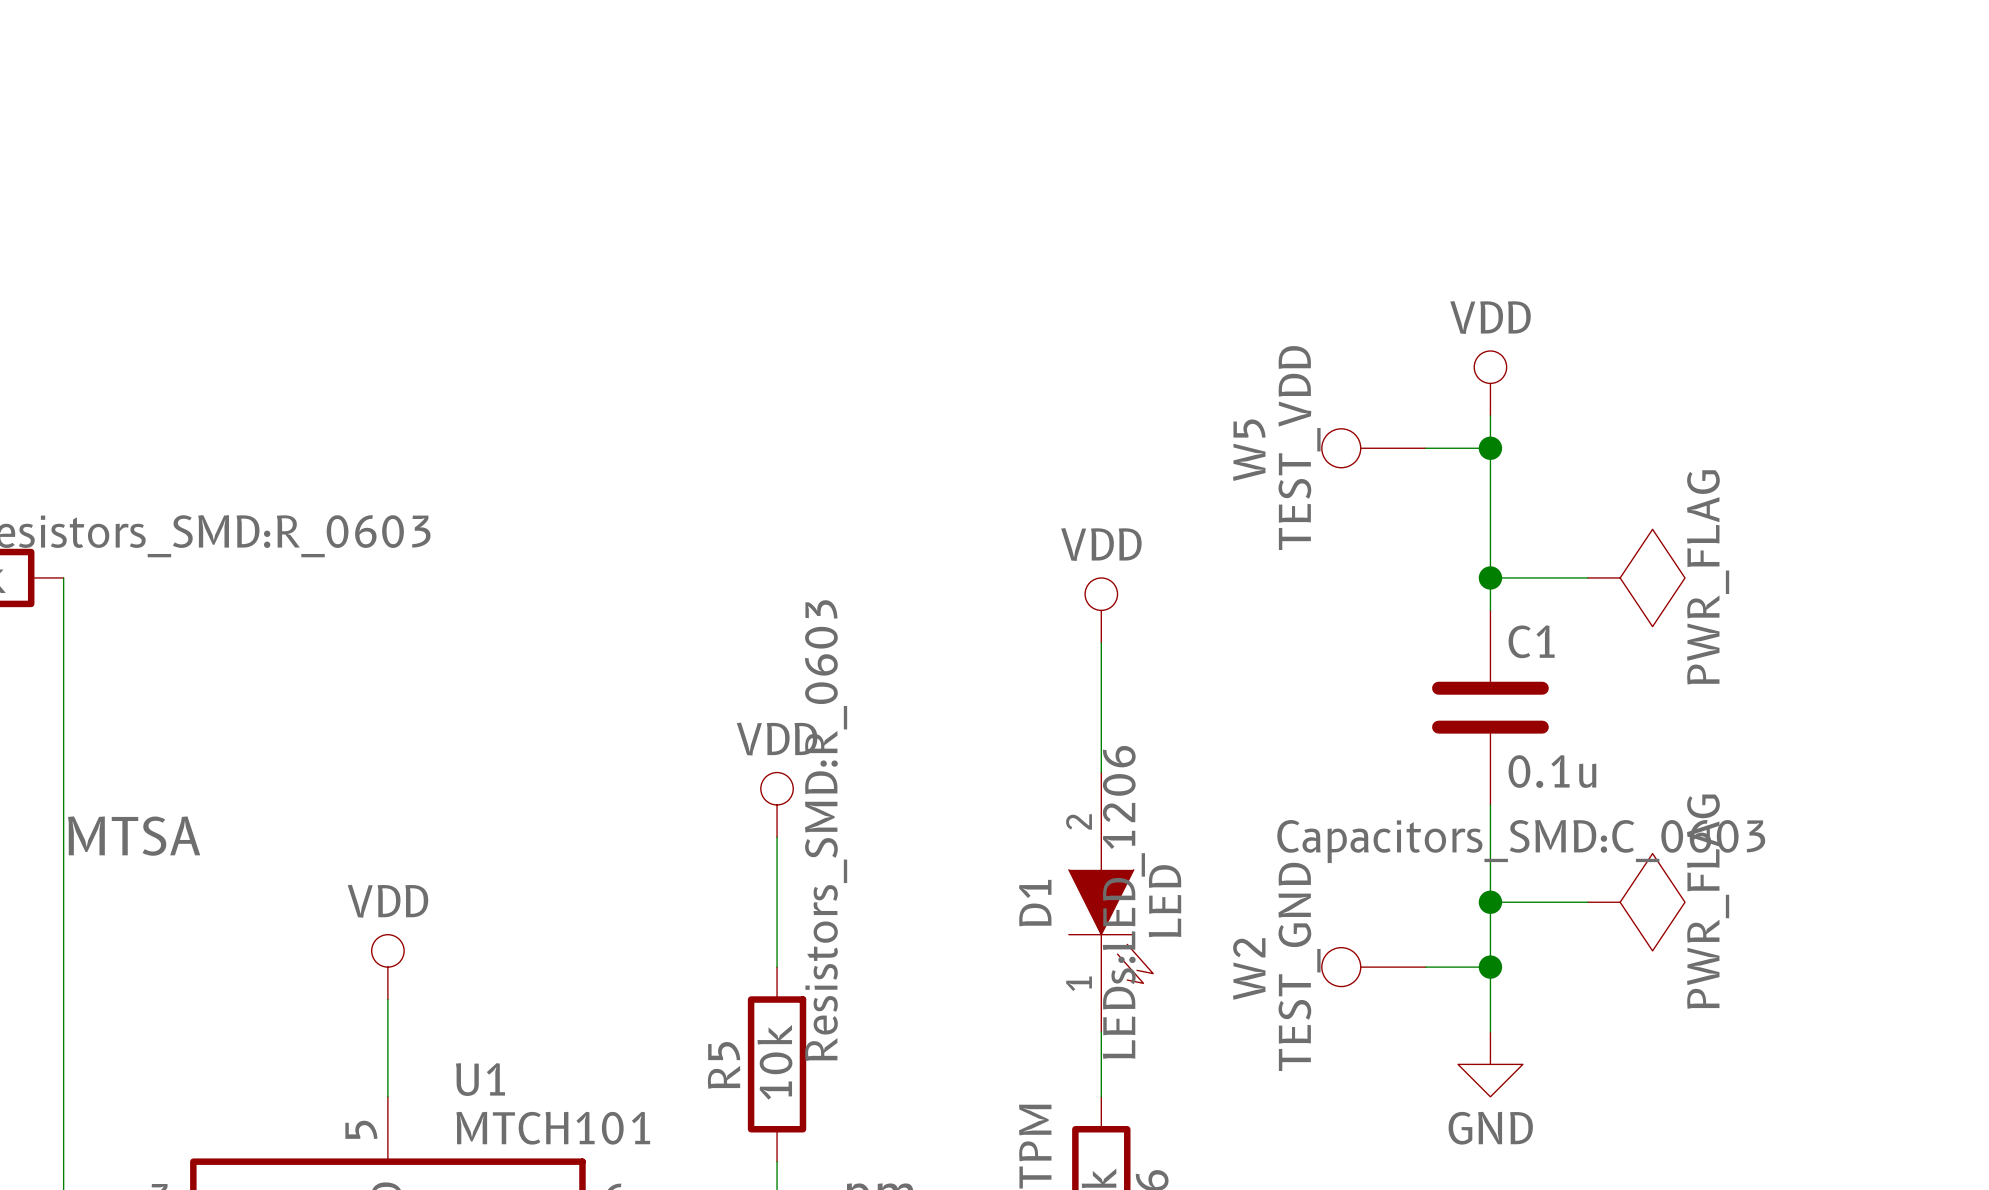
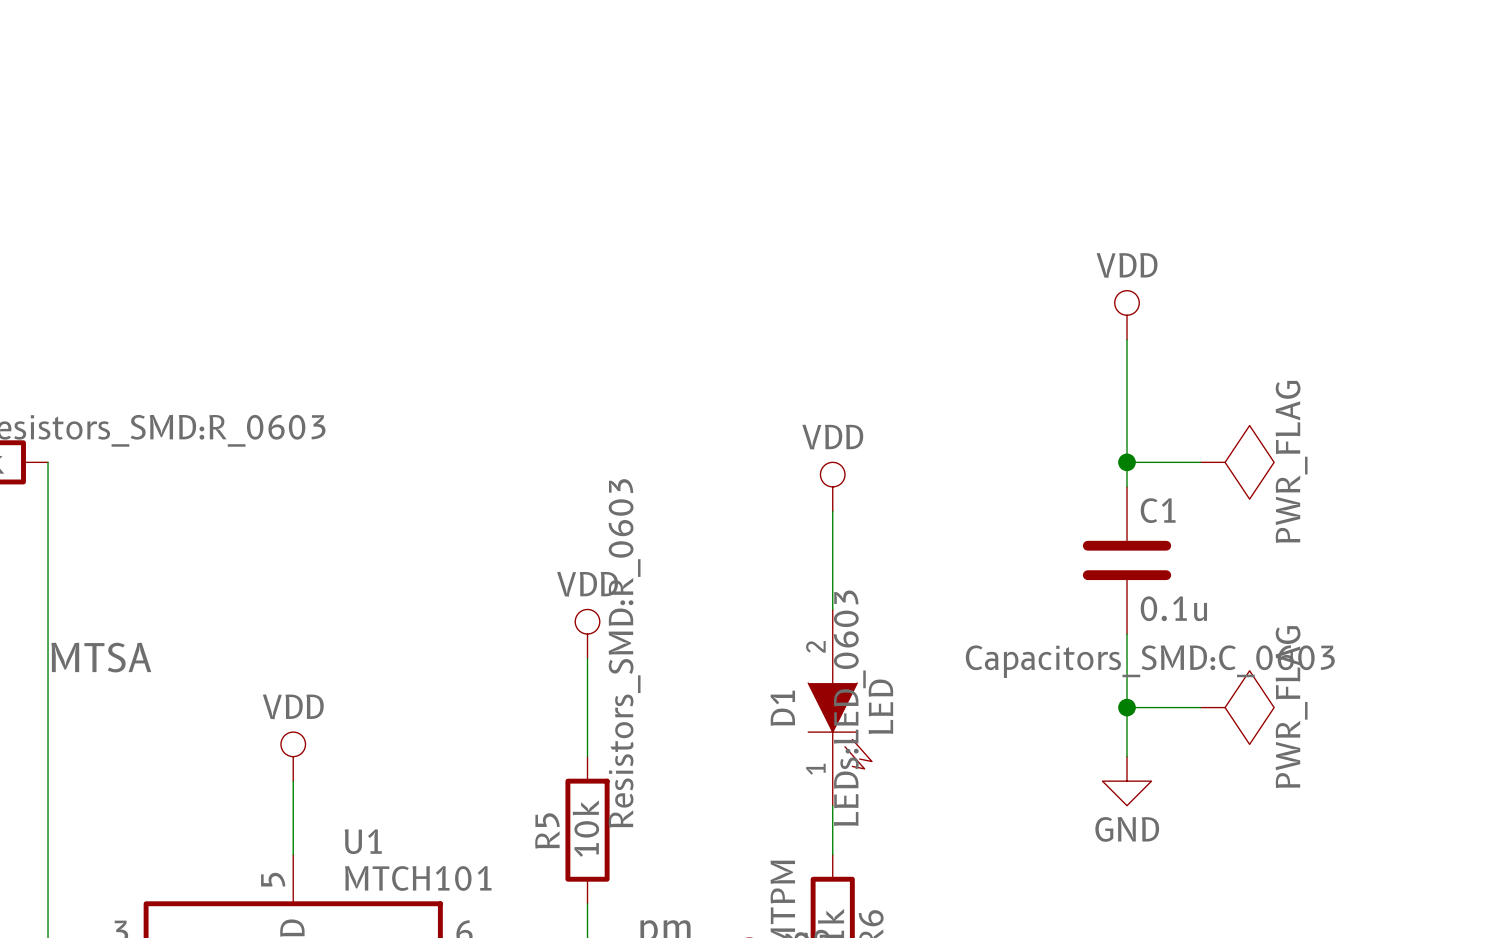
W5: TEST_VDD (1373, 448) -> none
wire: (1425, 448) (1490, 448) -> none
junction: (1490, 448) -> none
D1 text: LEDs:LED_1206 (1123, 902) -> LEDs:LED_0603 (849, 708)
W2: TEST_GND (1373, 967) -> none
wire: (1425, 967) (1490, 967) (1490, 1031) -> none
junction: (1490, 967) -> none
power symbol position: GND (1490, 1064) -> GND (1127, 781)

